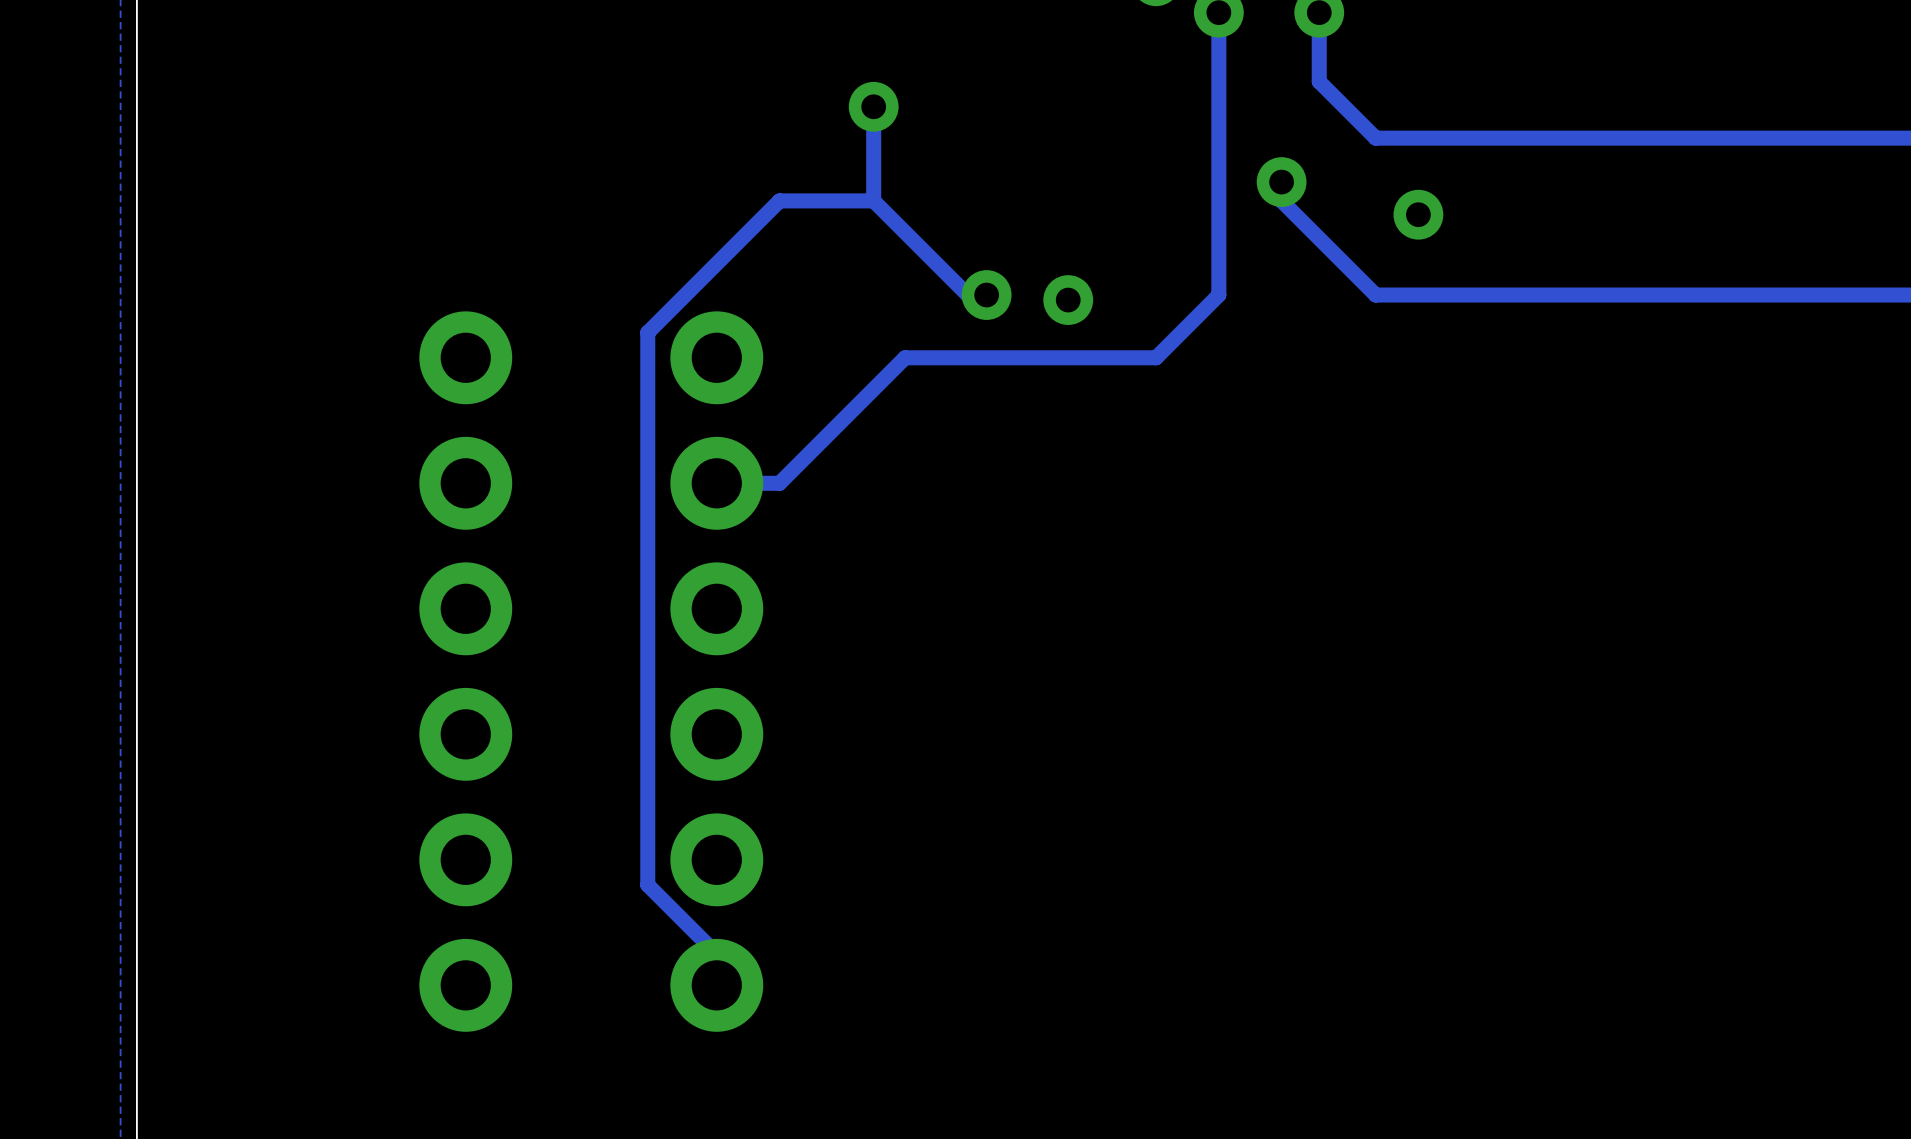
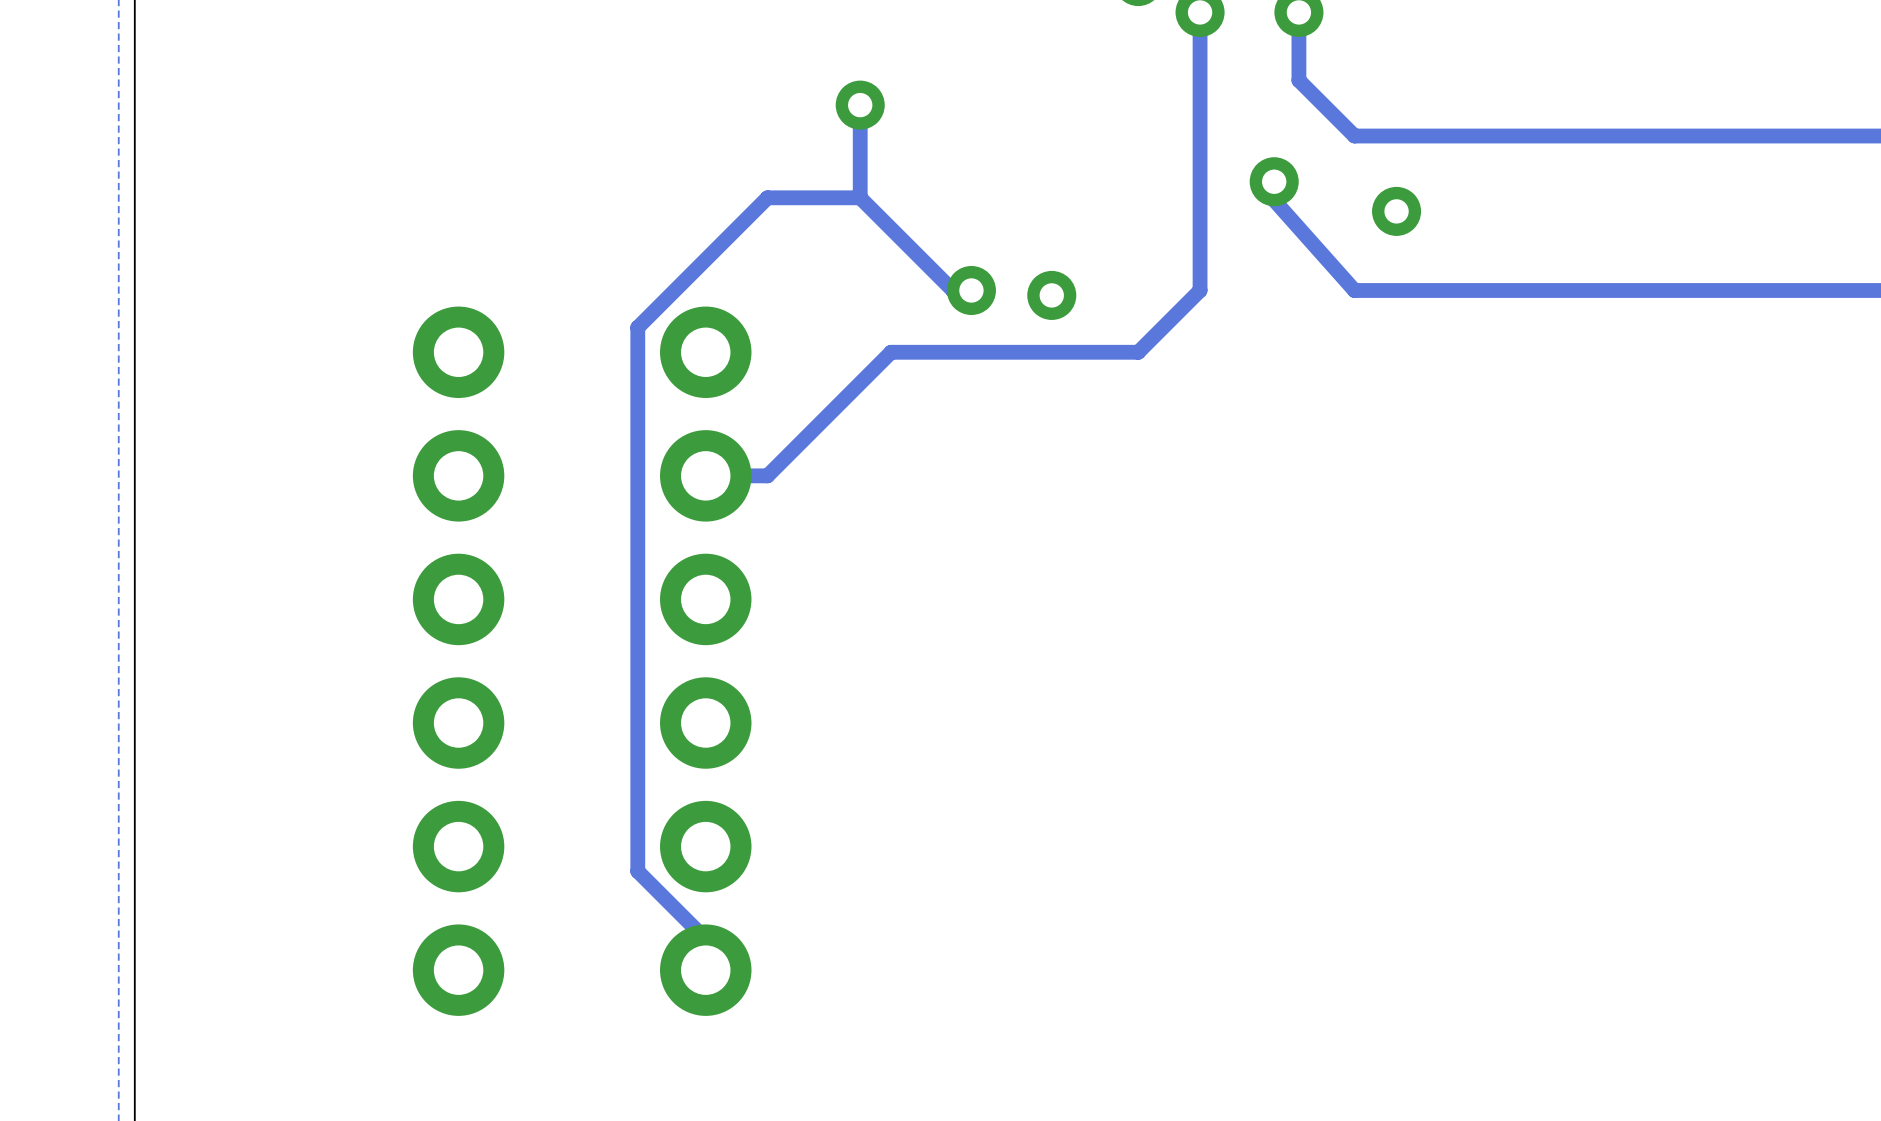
track: (1281, 182) (1281, 200) (1375, 295) -> (1274, 181) (1274, 200) (1354, 290)
via position: (1281, 182) -> (1274, 181)

